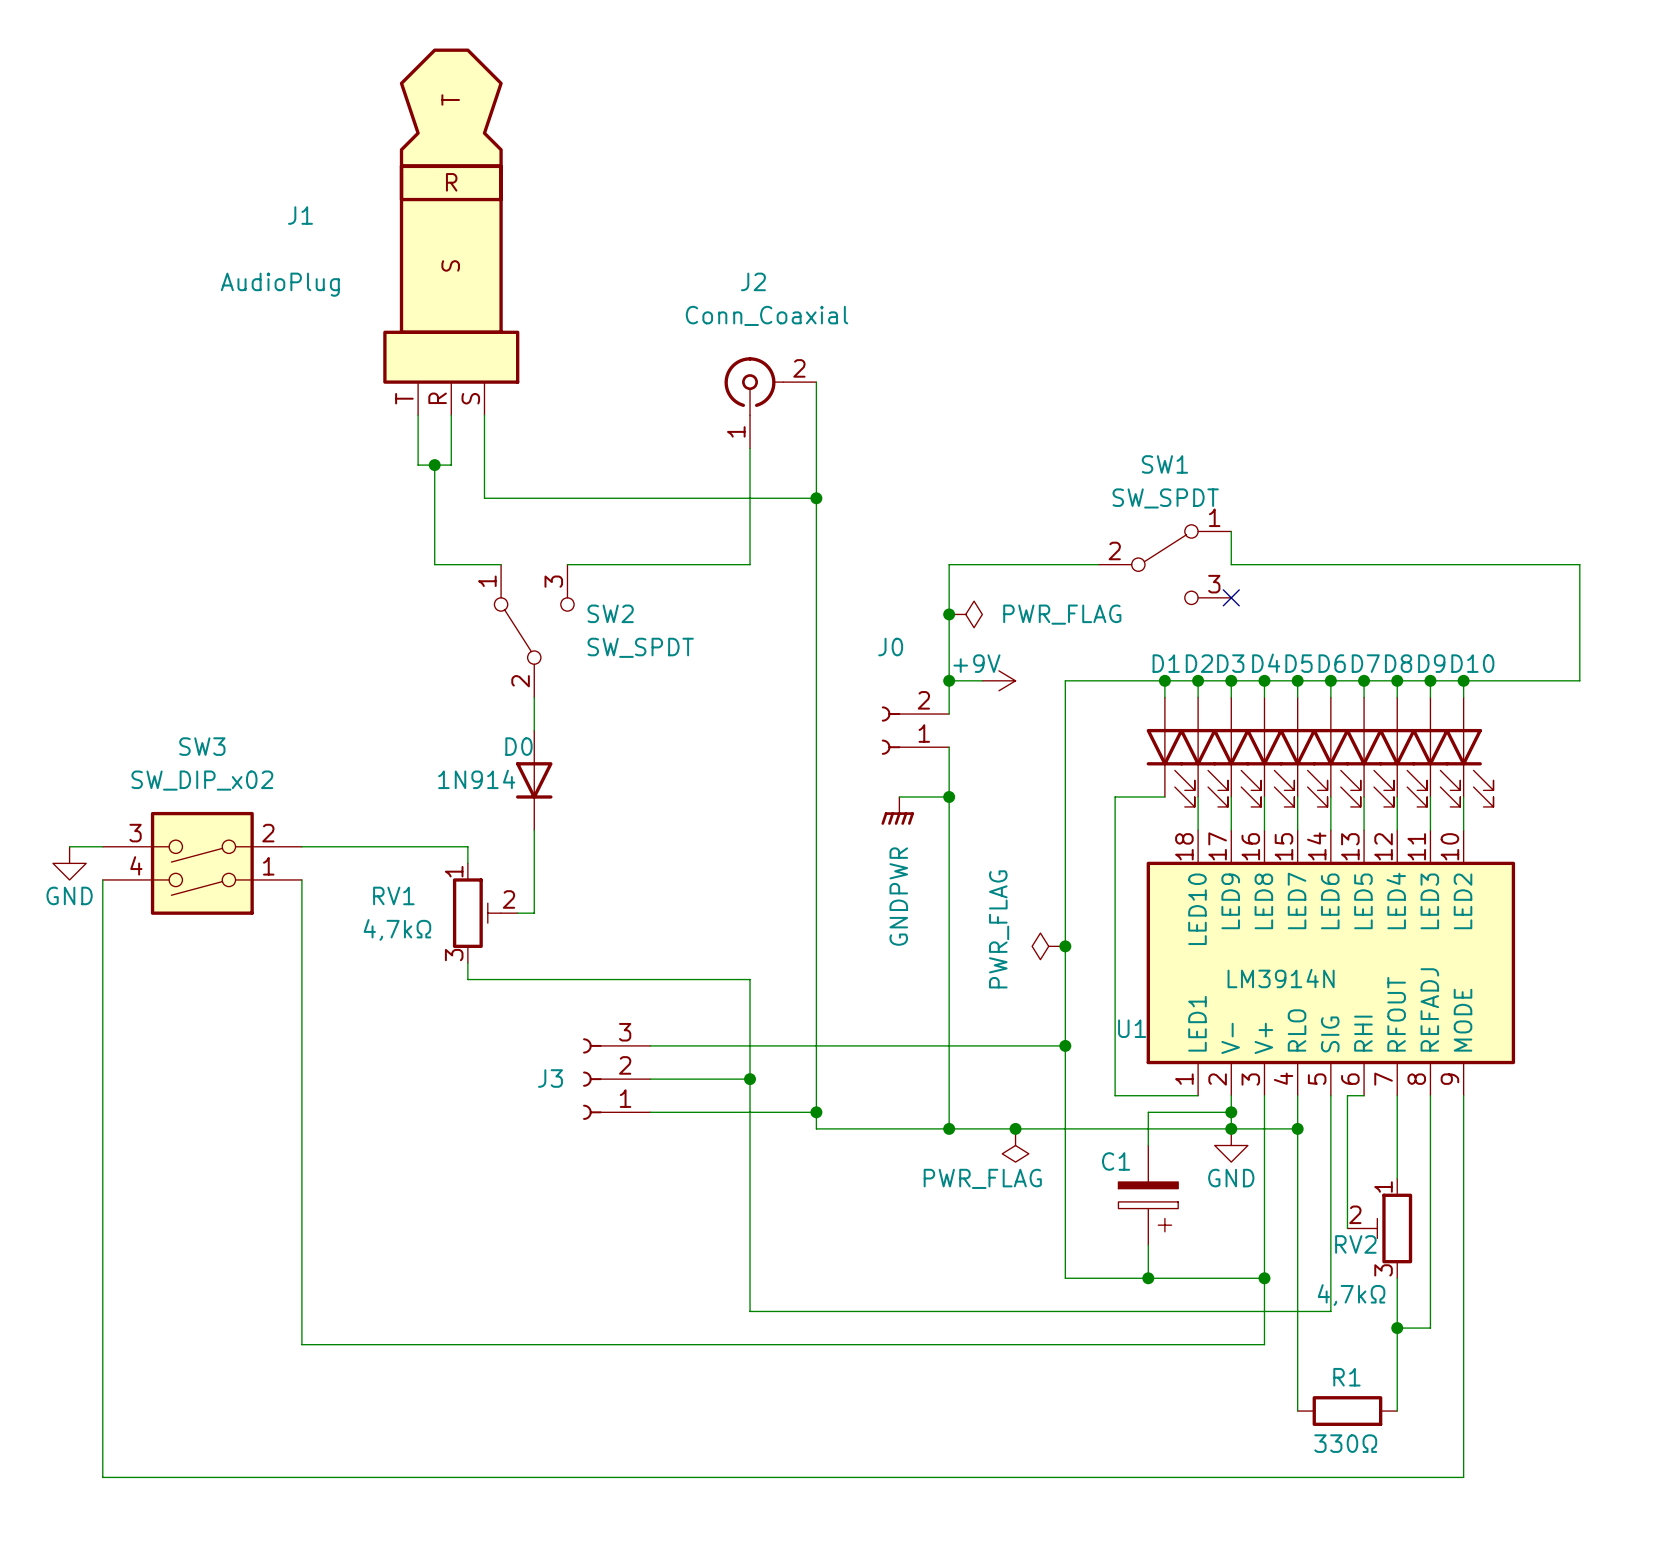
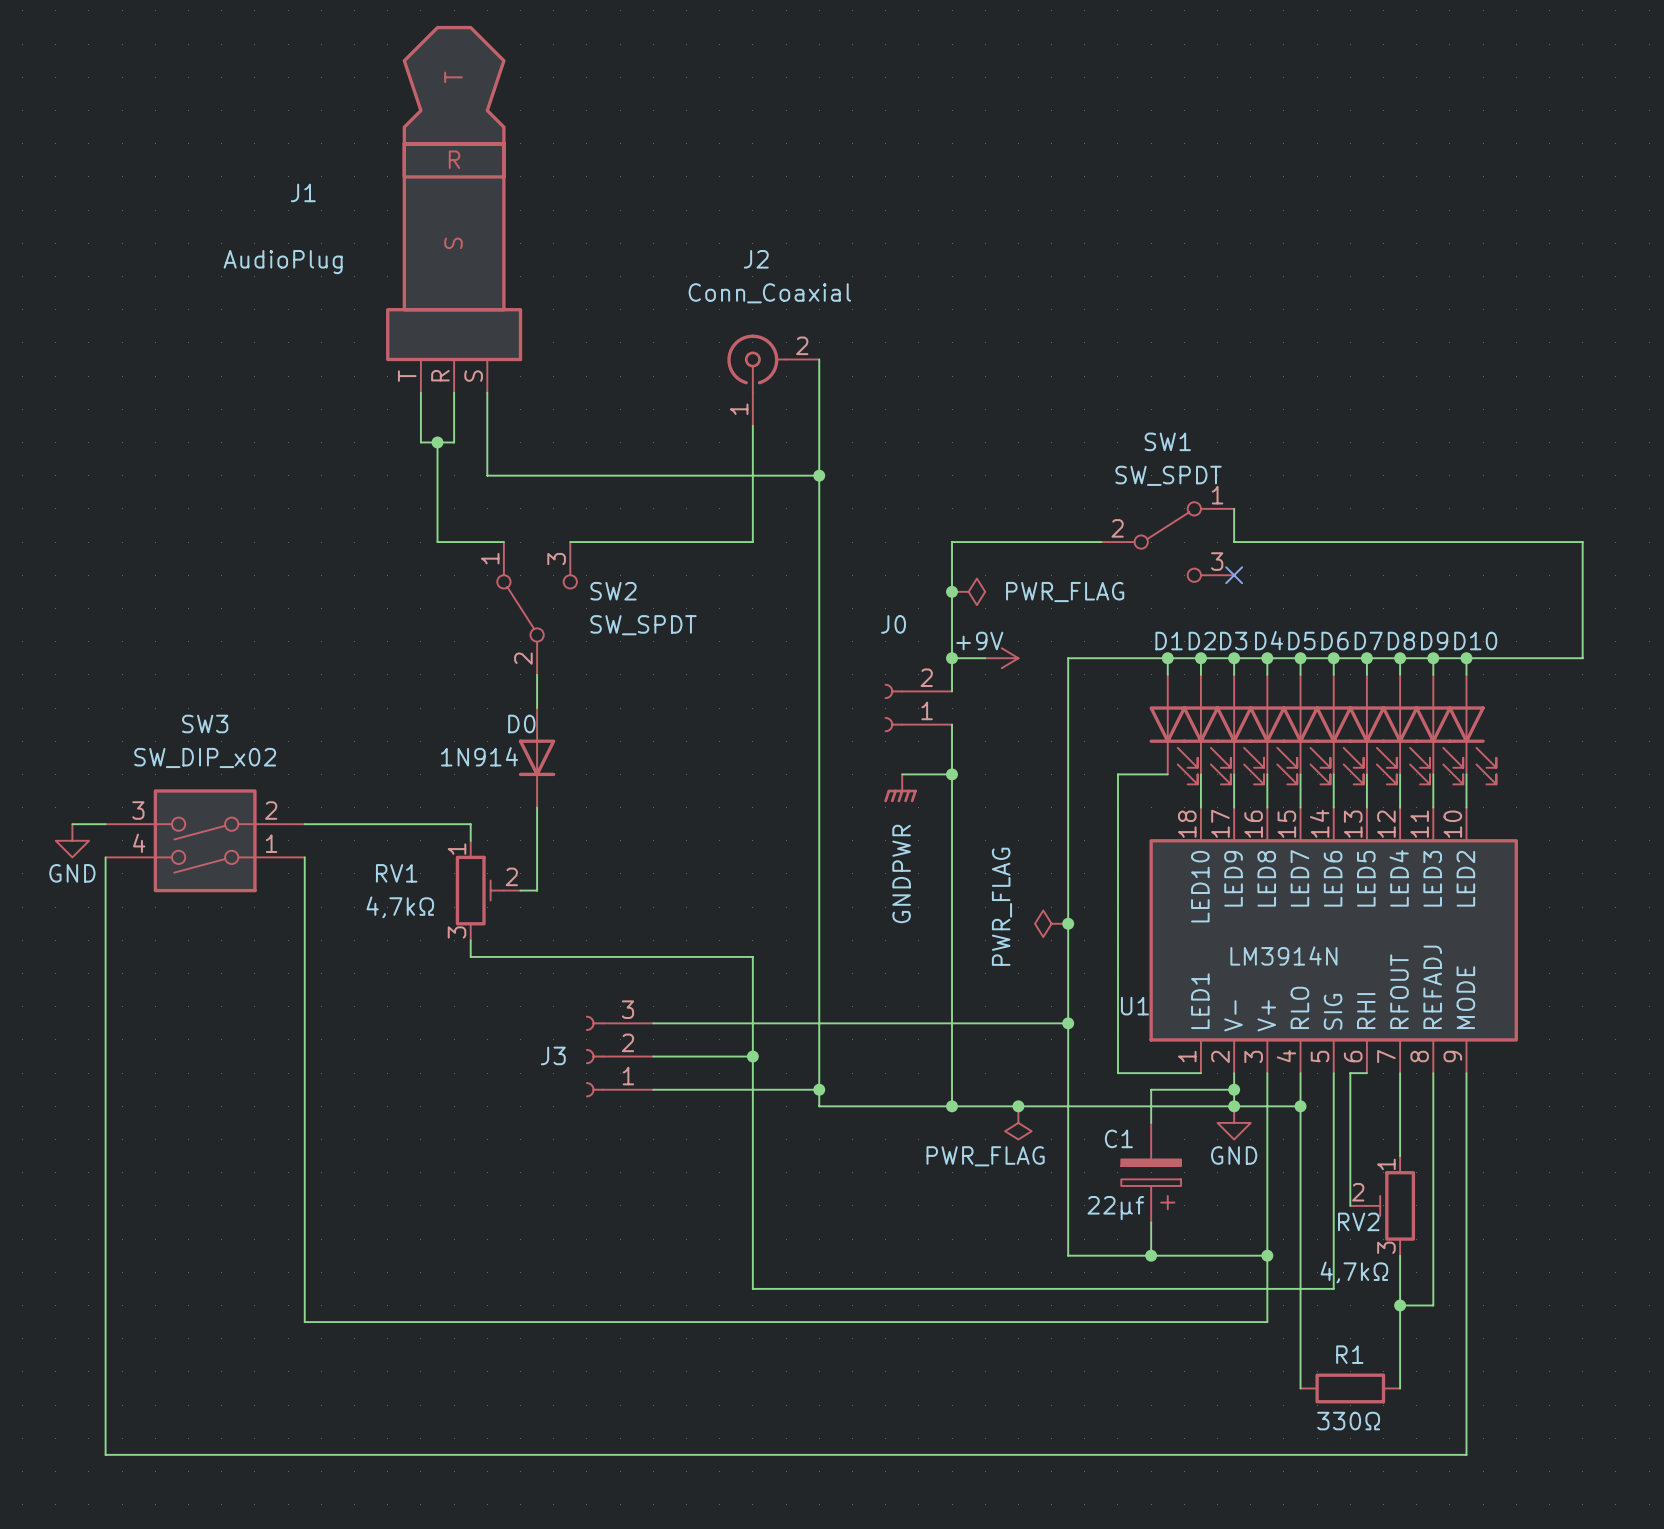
C1 value: none -> 22µf (1115, 1208)

